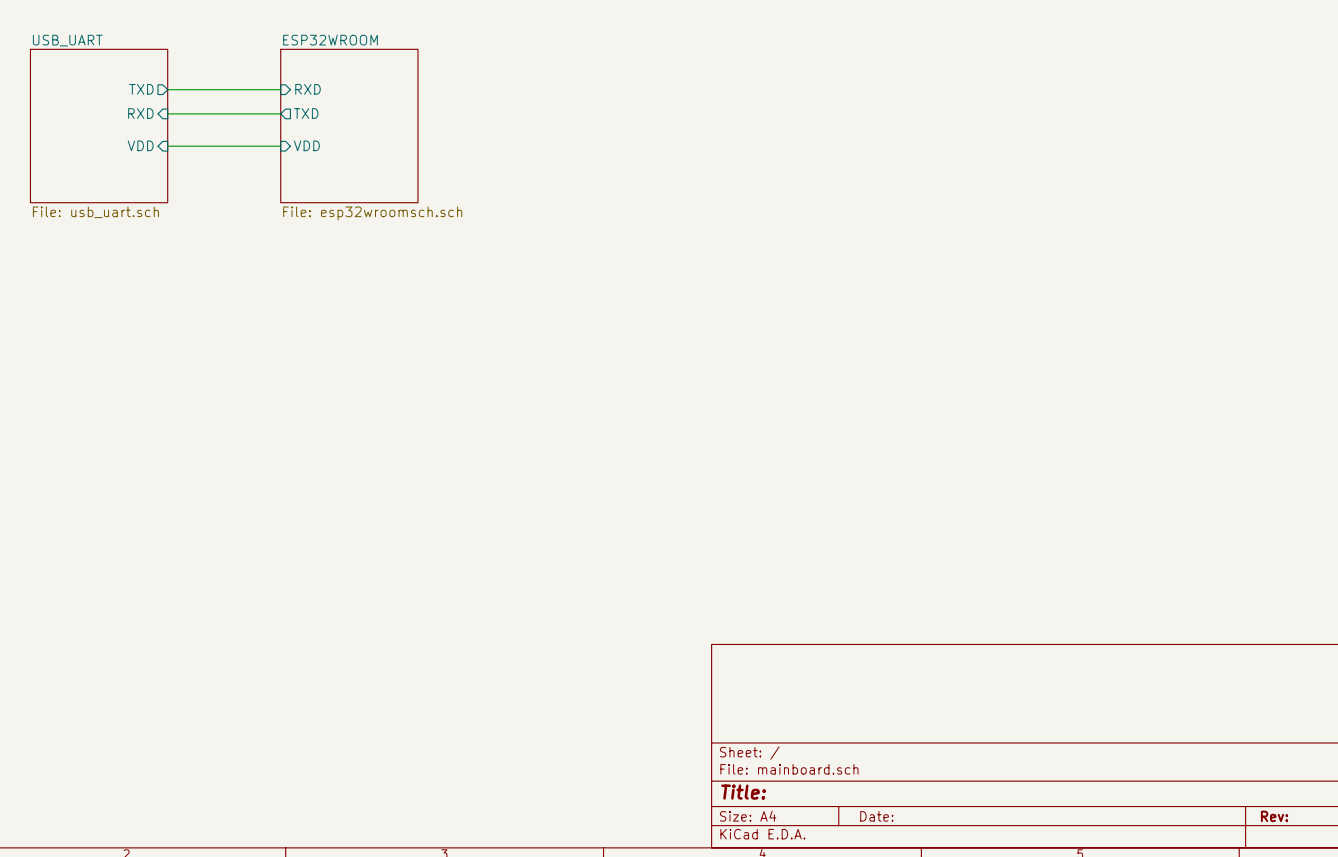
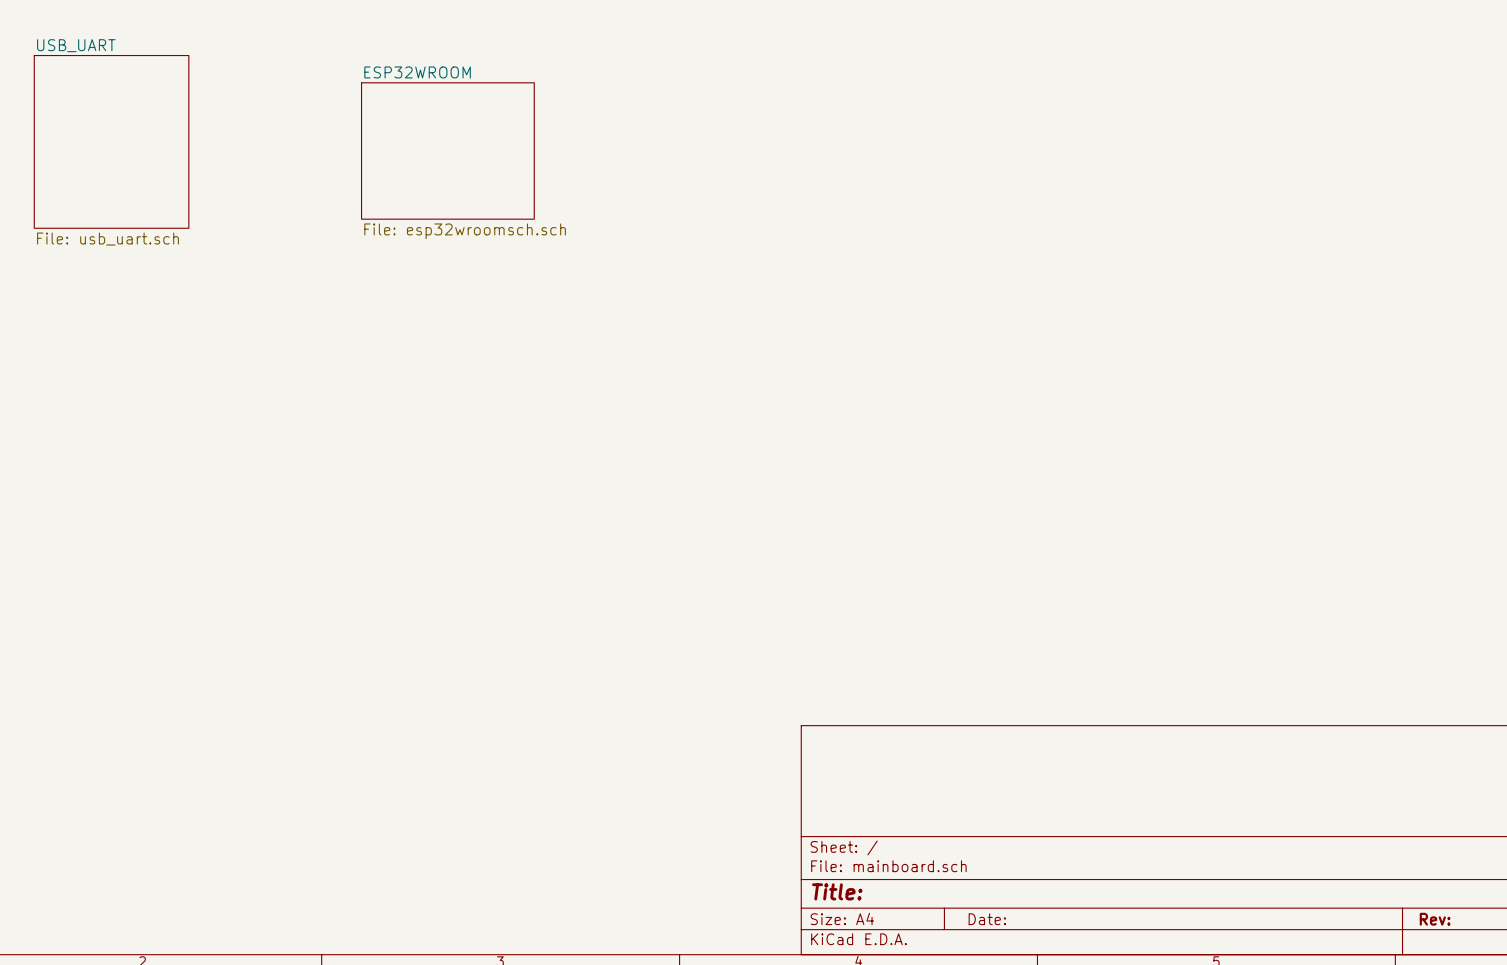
sheet ESP32WROOM name position: ESP32WROOM (330, 40) -> ESP32WROOM (417, 72)
sheet ESP32WROOM shape: [280, 49, 418, 203] -> [361, 82, 535, 220]
sheet pin: TXD (141, 89) -> none
wire: (167, 89) (280, 89) -> none
sheet pin: RXD (308, 89) -> none
sheet pin: RXD (140, 113) -> none
wire: (167, 113) (280, 113) -> none
sheet pin: TXD (306, 113) -> none
sheet pin: VDD (140, 145) -> none
sheet pin: VDD (306, 145) -> none
wire: (167, 146) (280, 146) -> none
sheet ESP32WROOM value position: File: esp32wroomsch.sch (372, 213) -> File: esp32wroomsch.sch (465, 231)

